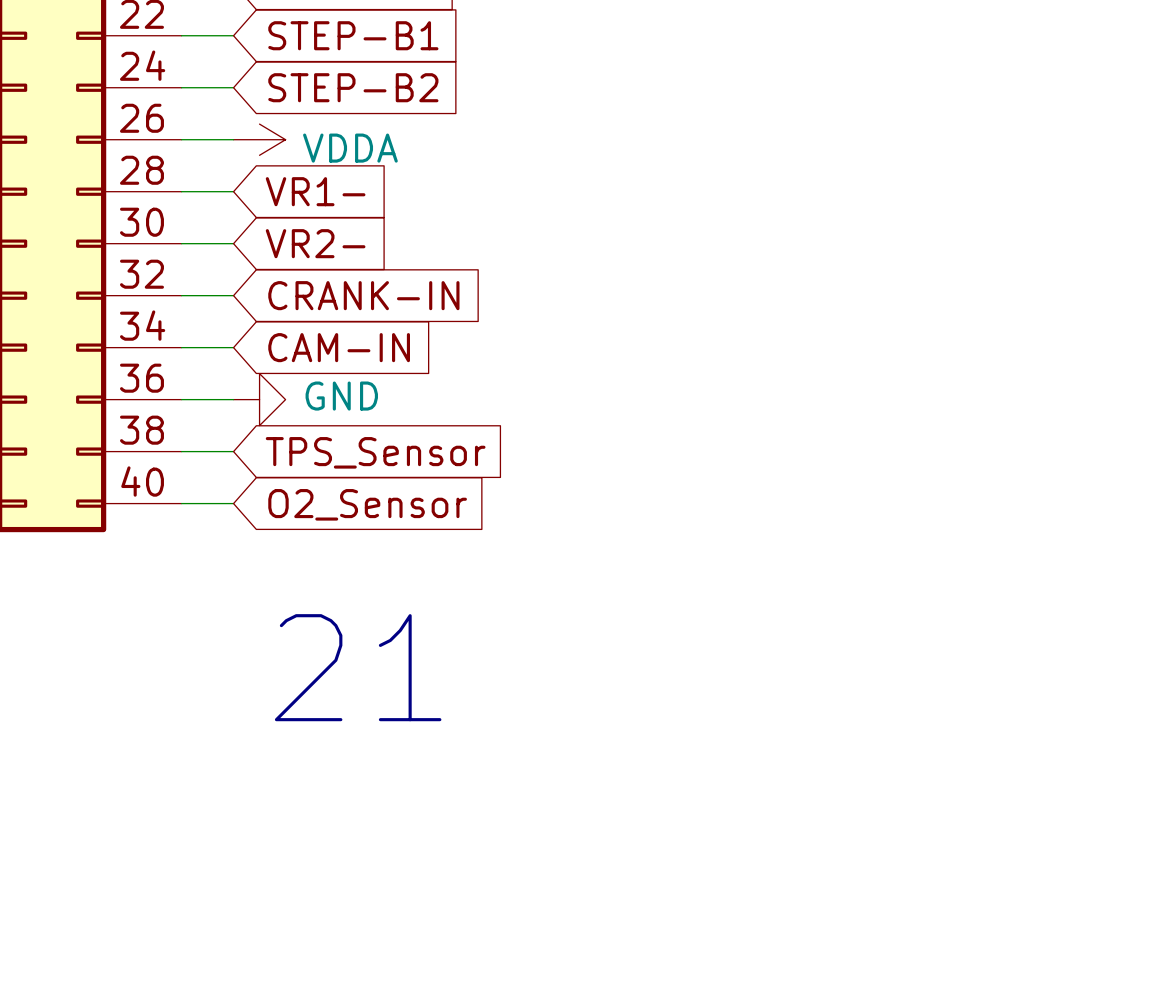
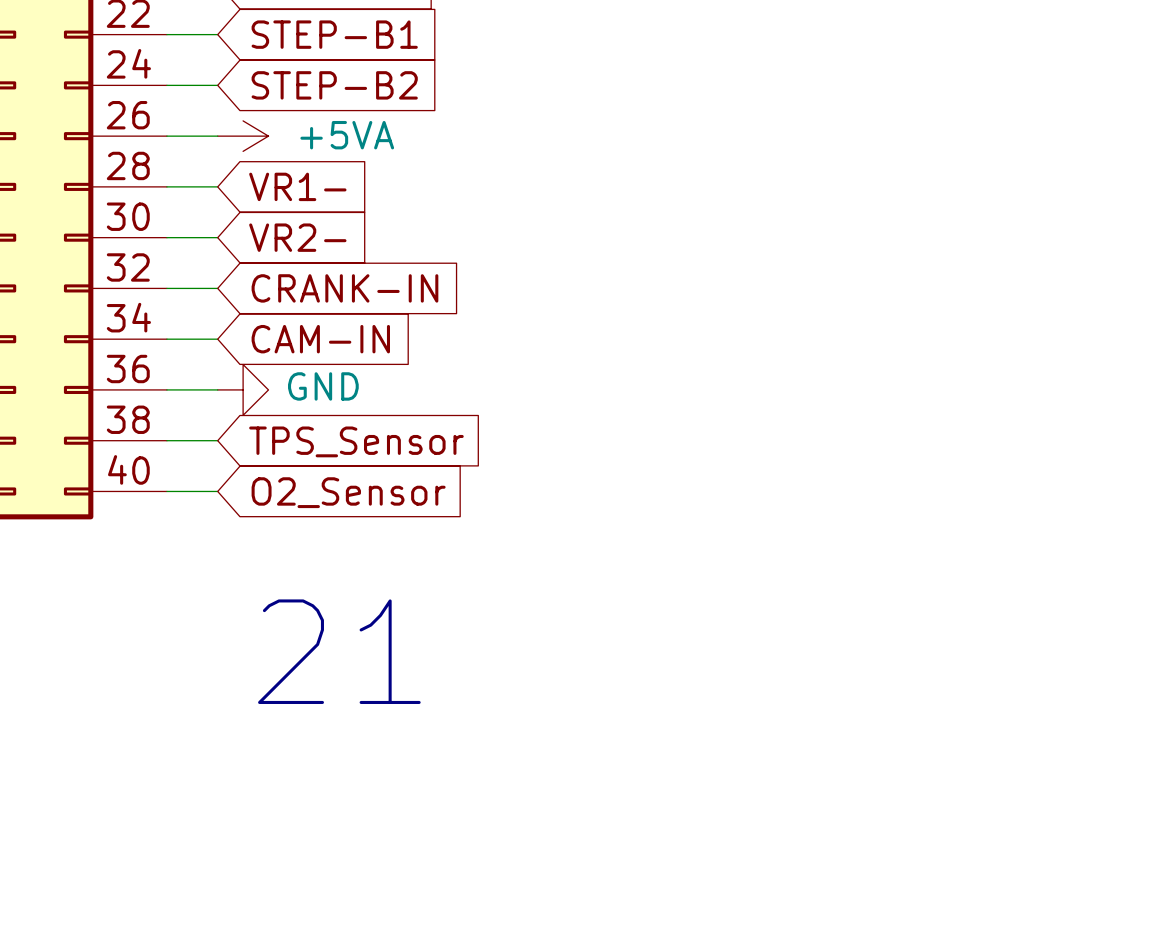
power symbol: VDDA (259, 139) -> +5VA (243, 136)

